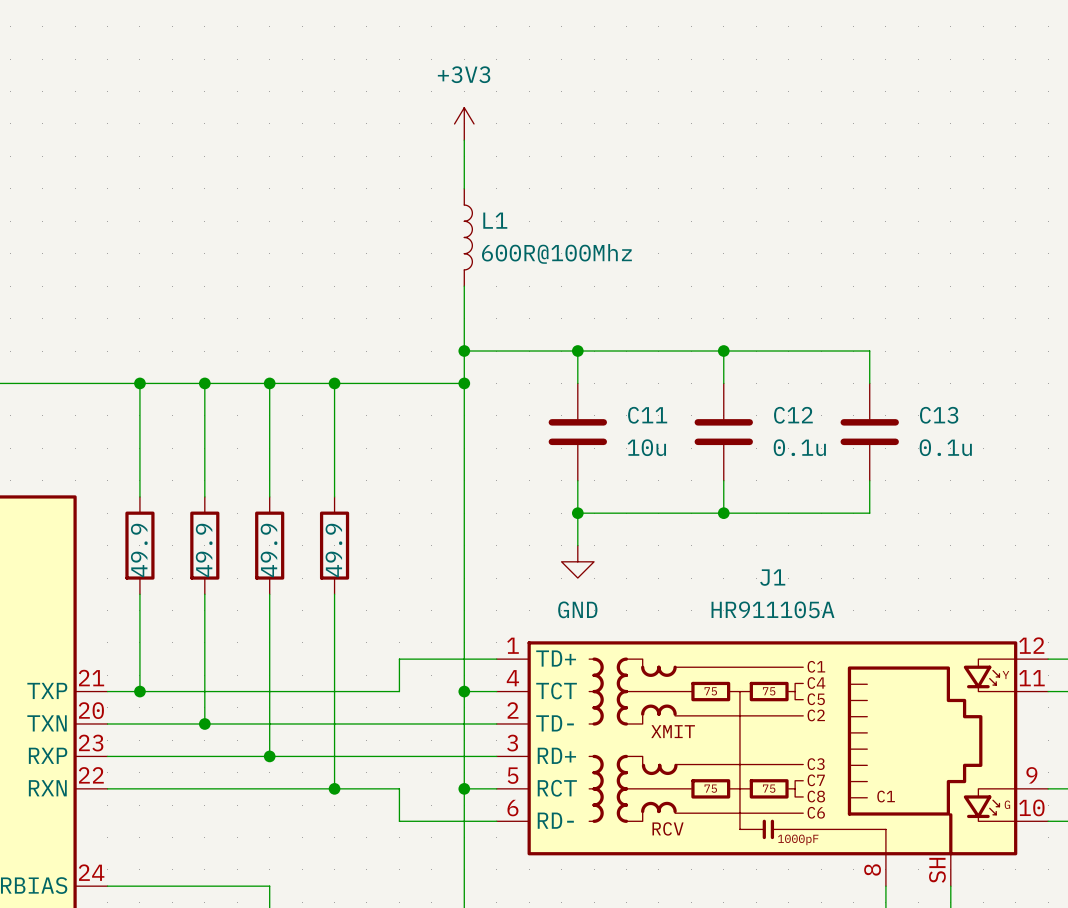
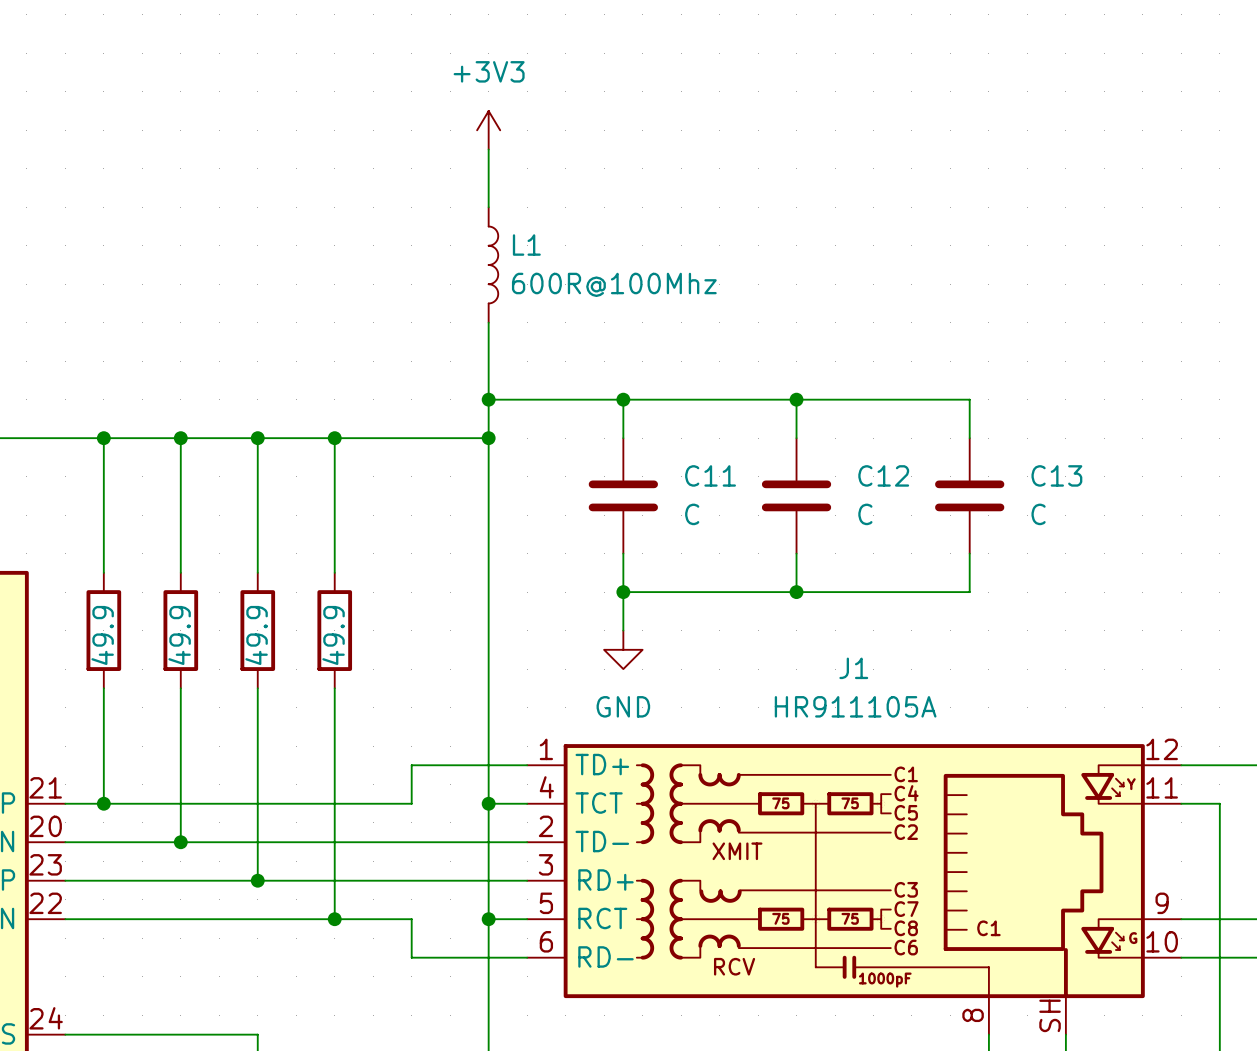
C11 value: 10u (646, 447) -> C (692, 514)
C12 value: 0.1u (799, 447) -> C (865, 514)
C13 value: 0.1u (945, 447) -> C (1038, 514)

